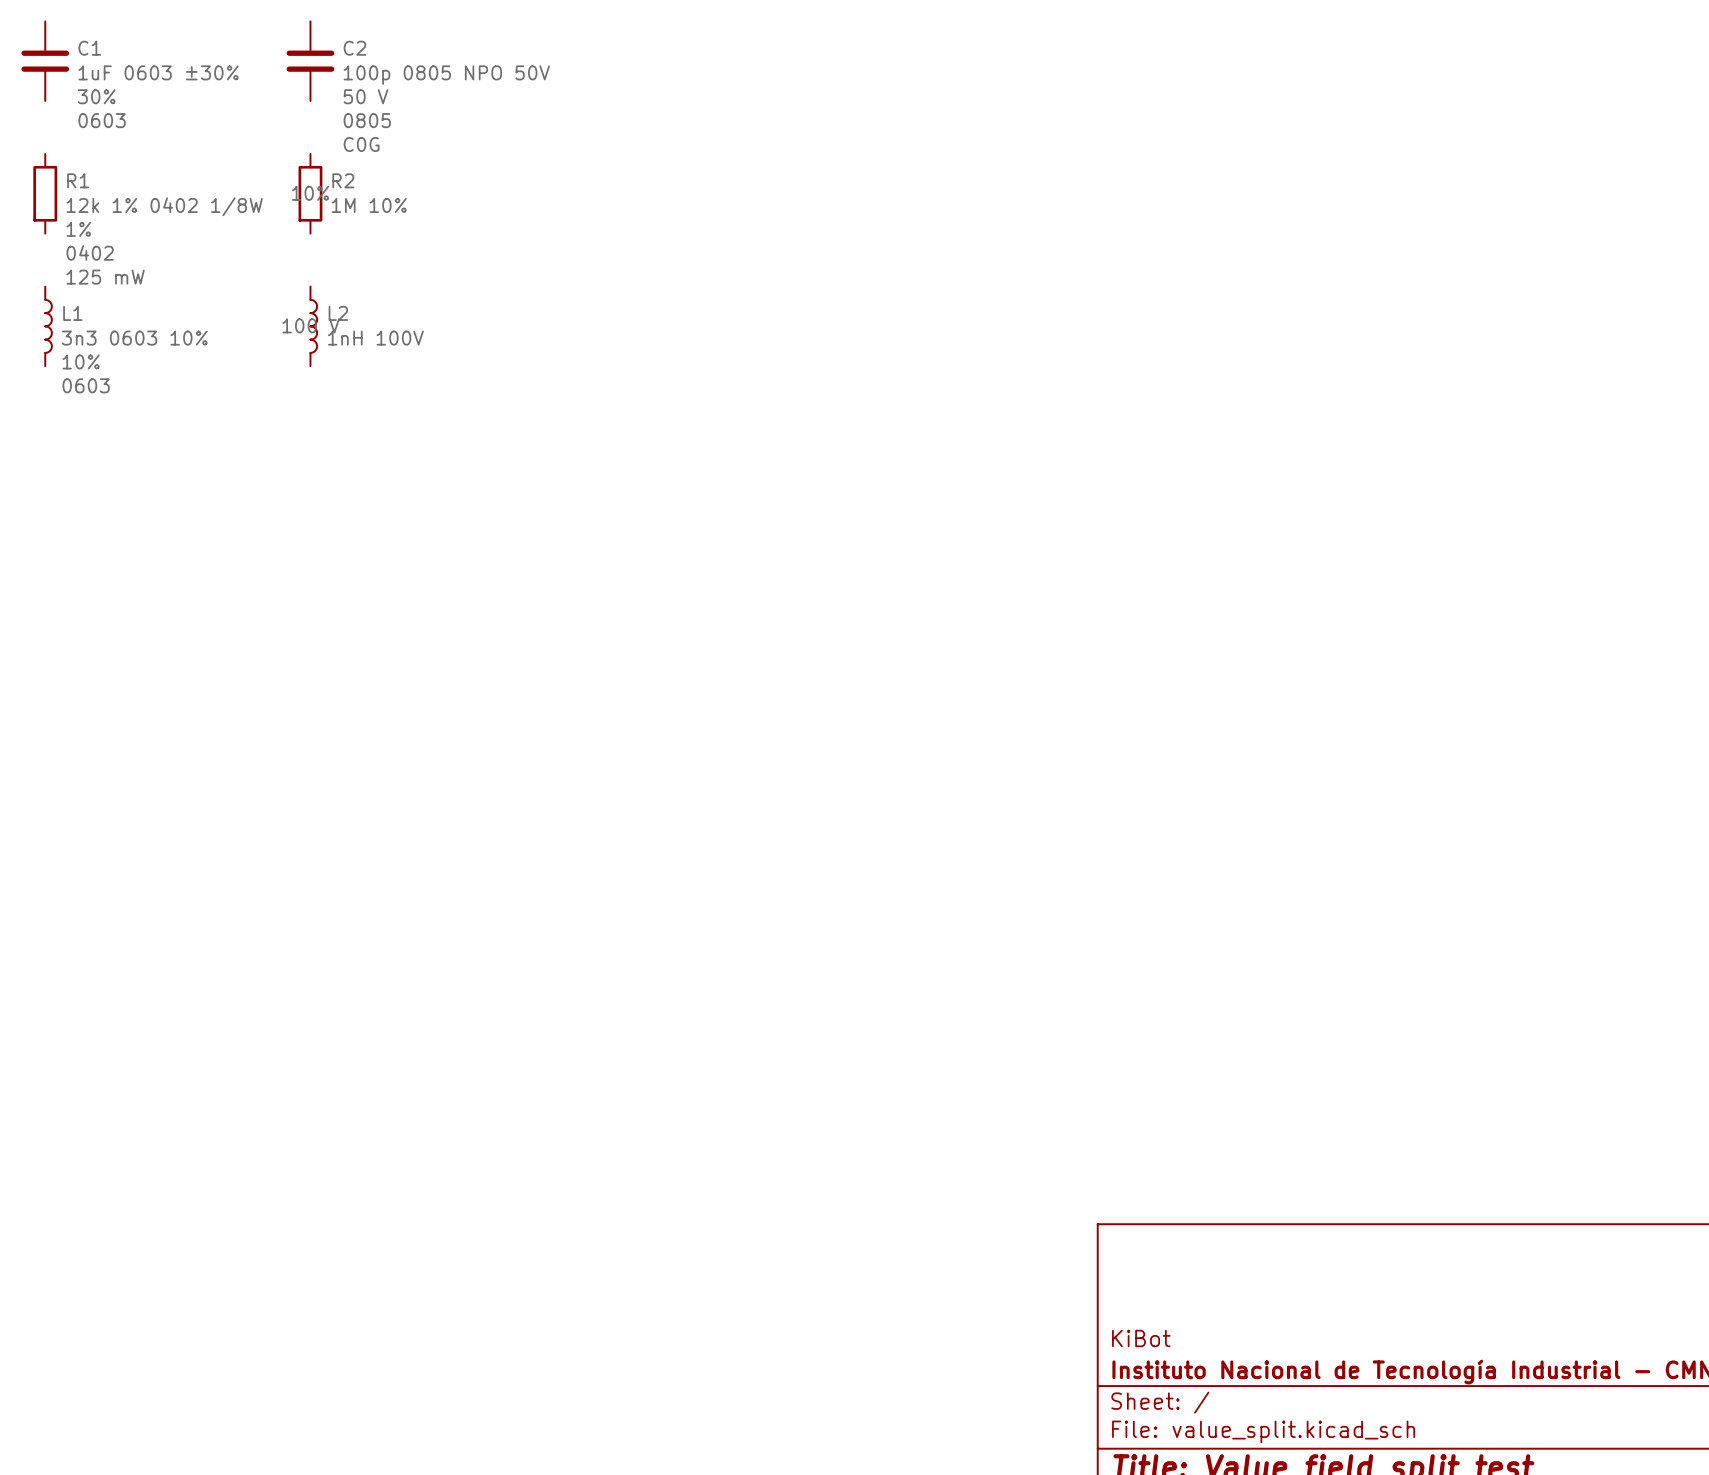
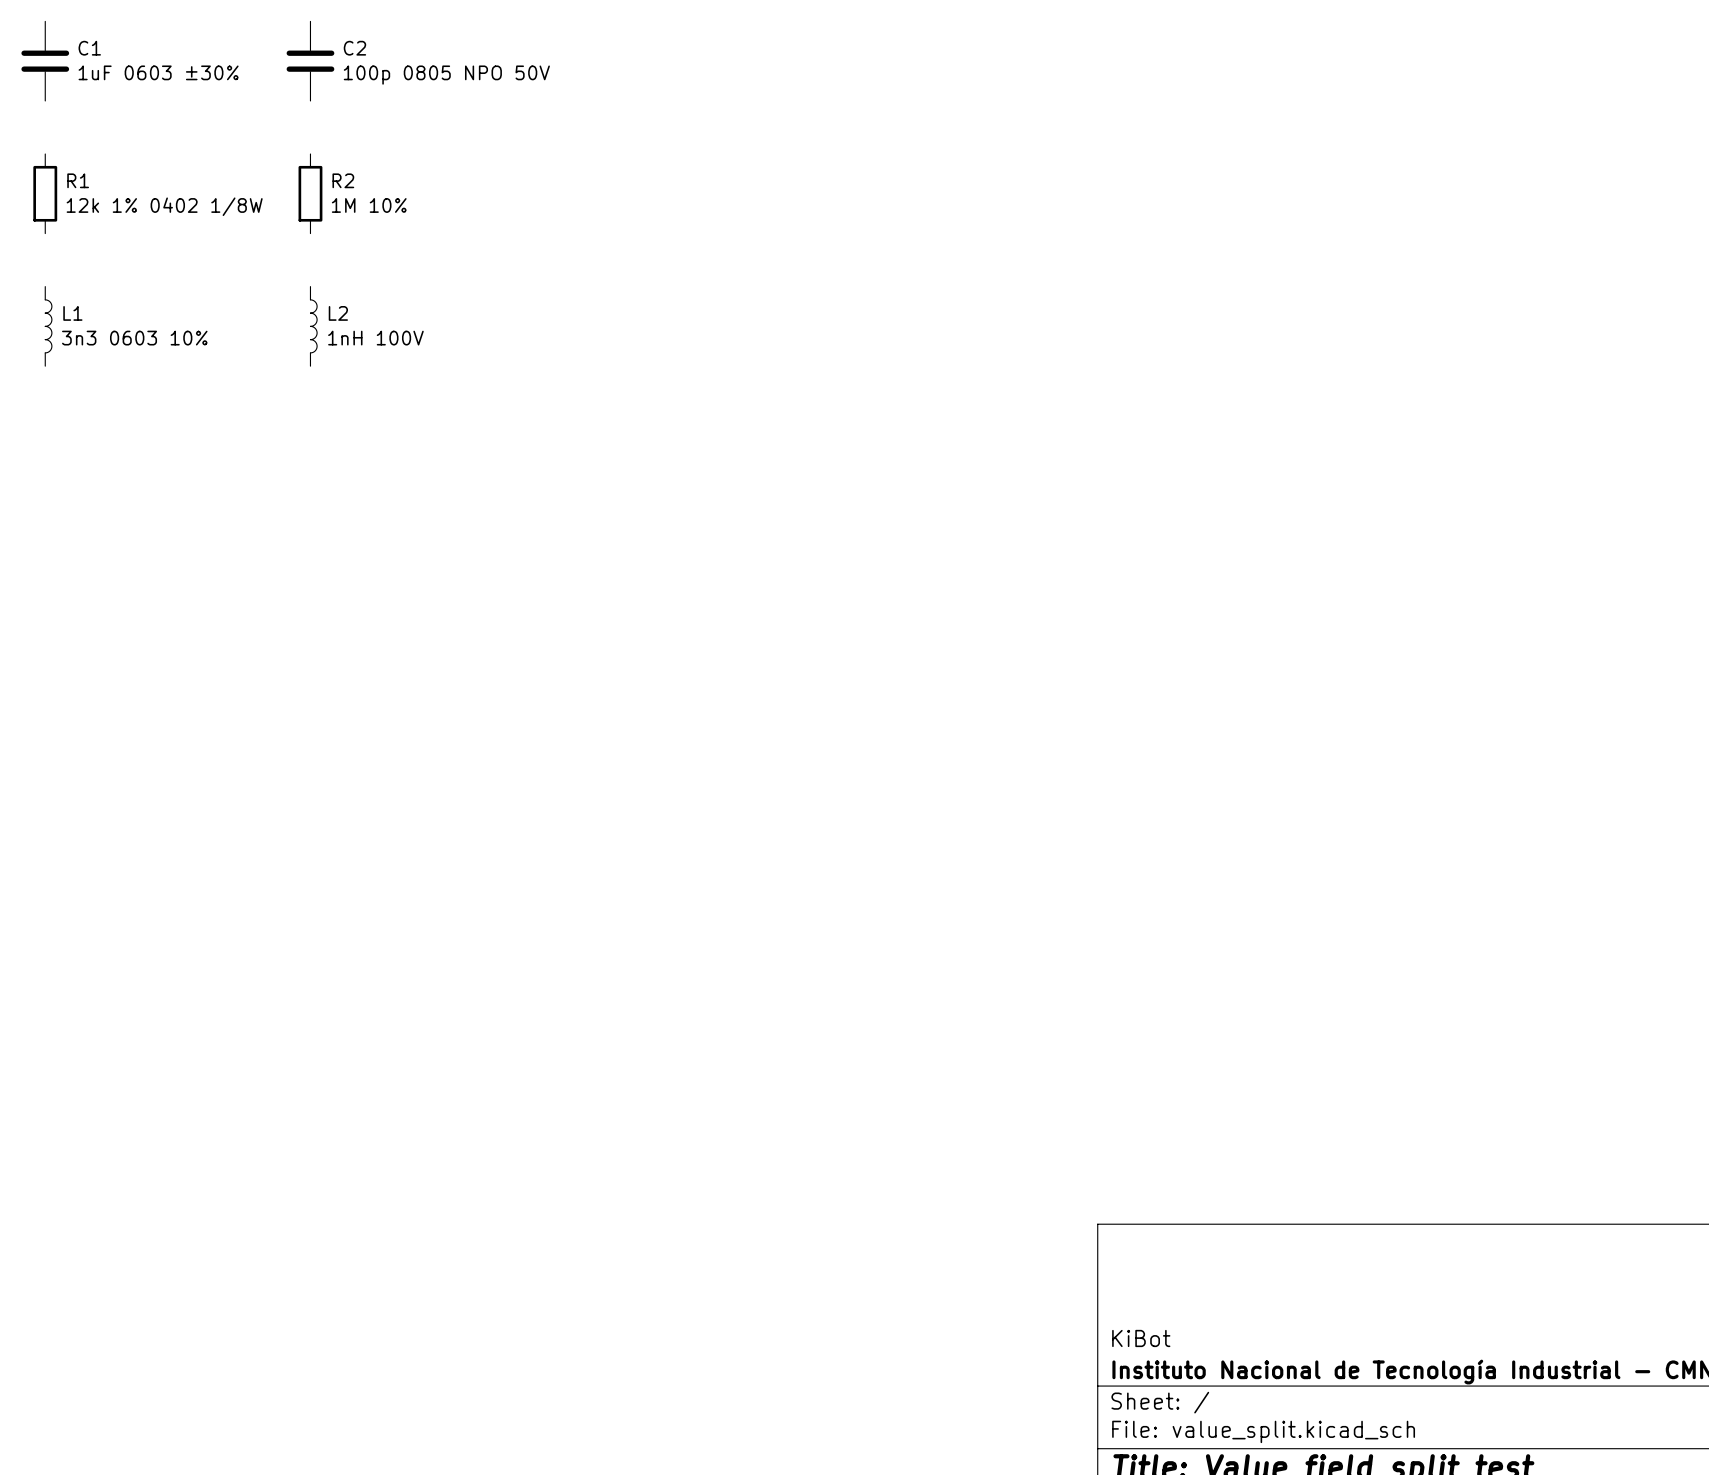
C1 text: 30% (96, 96) -> none
C2 text: 50 V (366, 96) -> none
C1 text: 0603 (102, 120) -> none
C2 text: 0805 (367, 120) -> none
C2 text: C0G (361, 144) -> none
R2 text: 10% (310, 193) -> none
R1 text: 1% (78, 229) -> none
R1 text: 0402 (90, 252) -> none
R1 text: 125 mW (105, 277) -> none
L2 text: 100 V (311, 325) -> none
L1 text: 10% (81, 361) -> none
L1 text: 0603 (86, 385) -> none

